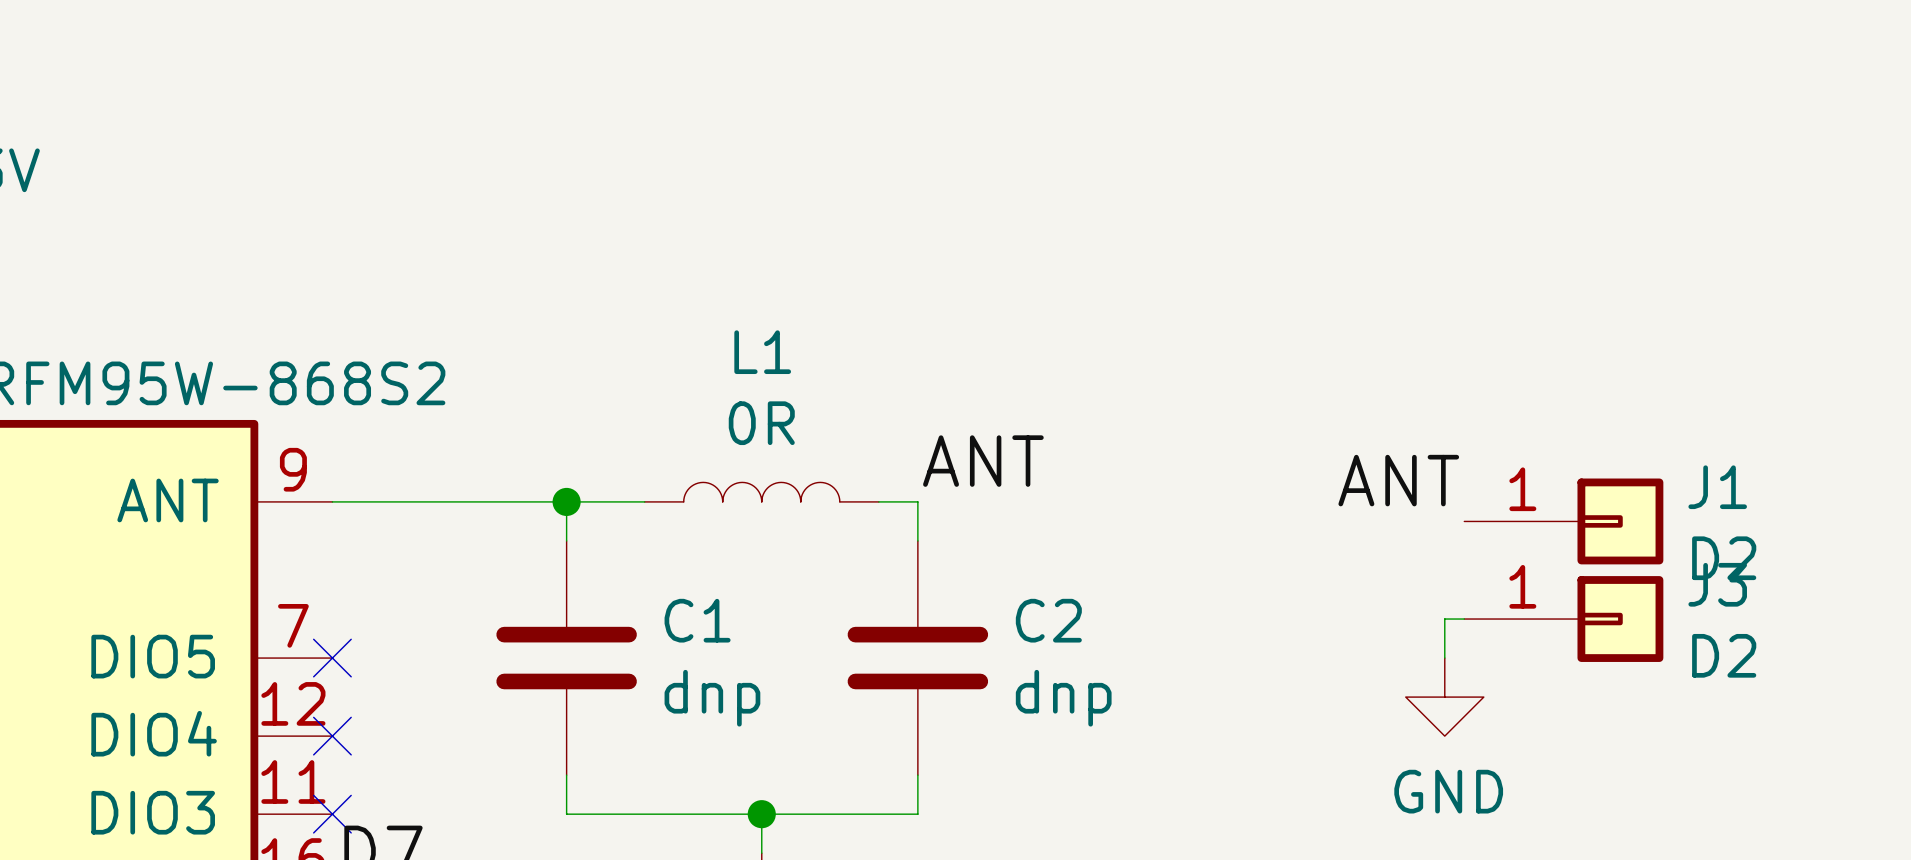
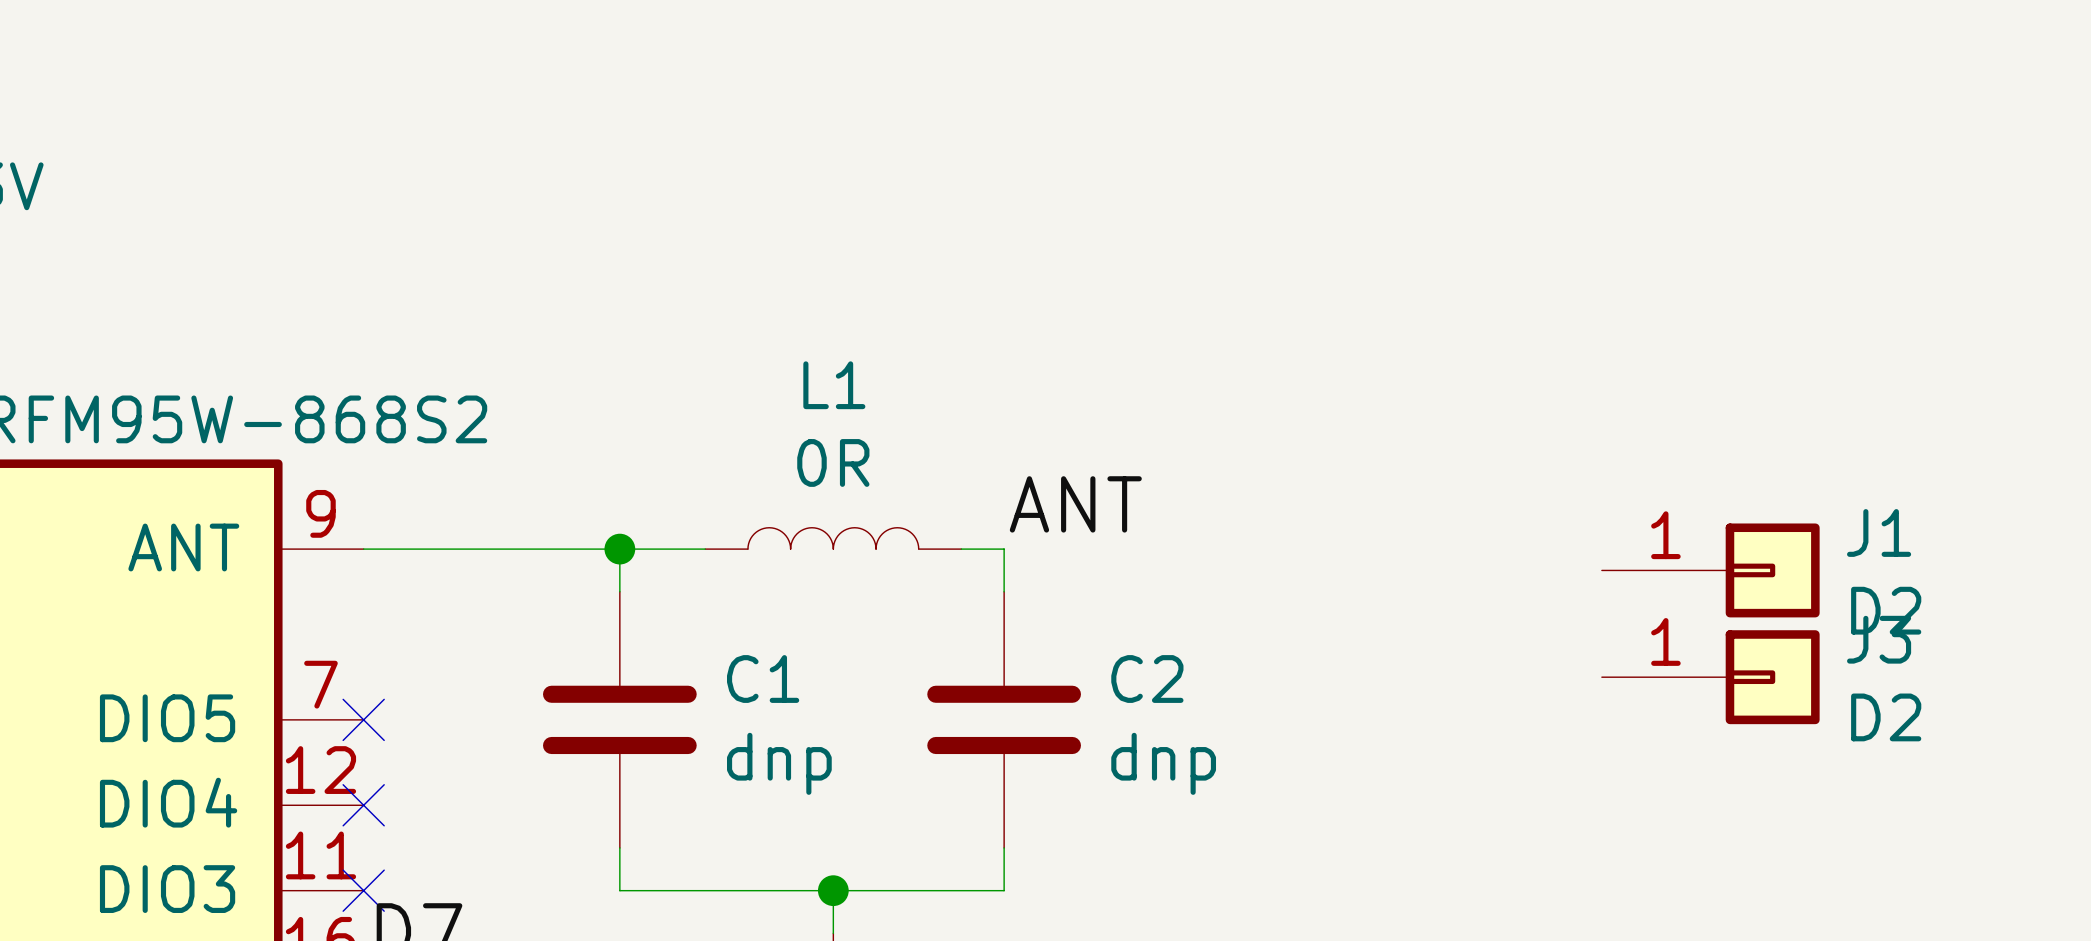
label: ANT (1398, 480) -> none
wire: (1464, 619) (1444, 619) (1444, 658) -> none
power symbol: GND (1444, 697) -> none

